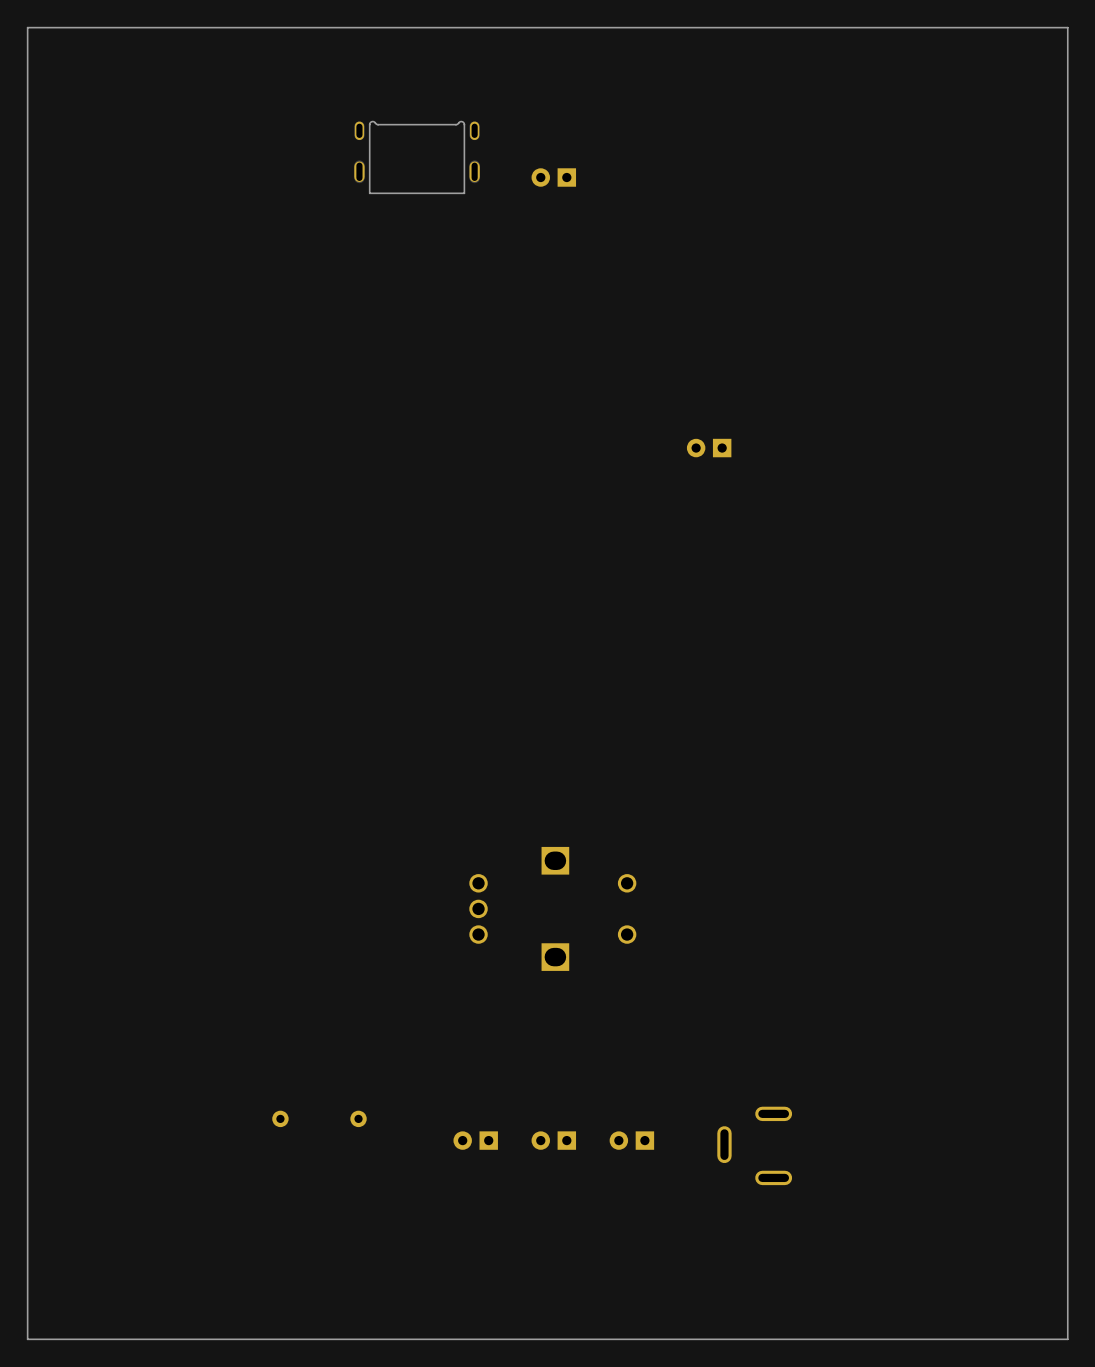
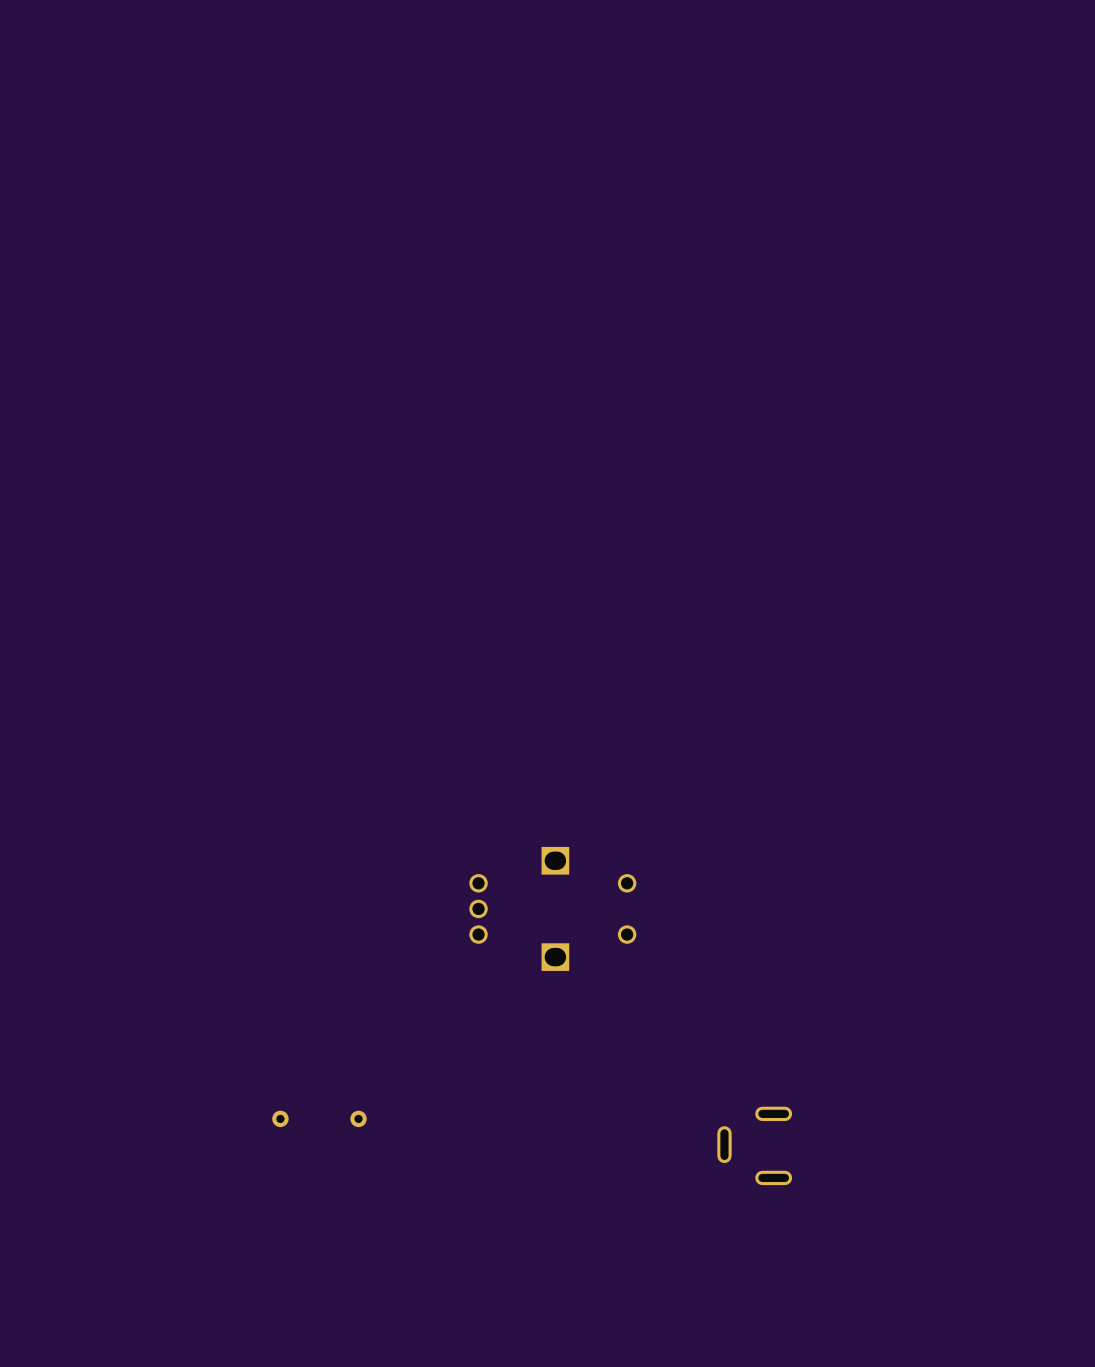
board edge: (1067, 27) (27, 27) (27, 1339) (1067, 1339) (1067, 27) -> none
part: (417, 157) -> none
part: (553, 177) -> none
part: (709, 448) -> none
part: (475, 1140) -> none
part: (553, 1140) -> none
part: (631, 1140) -> none

